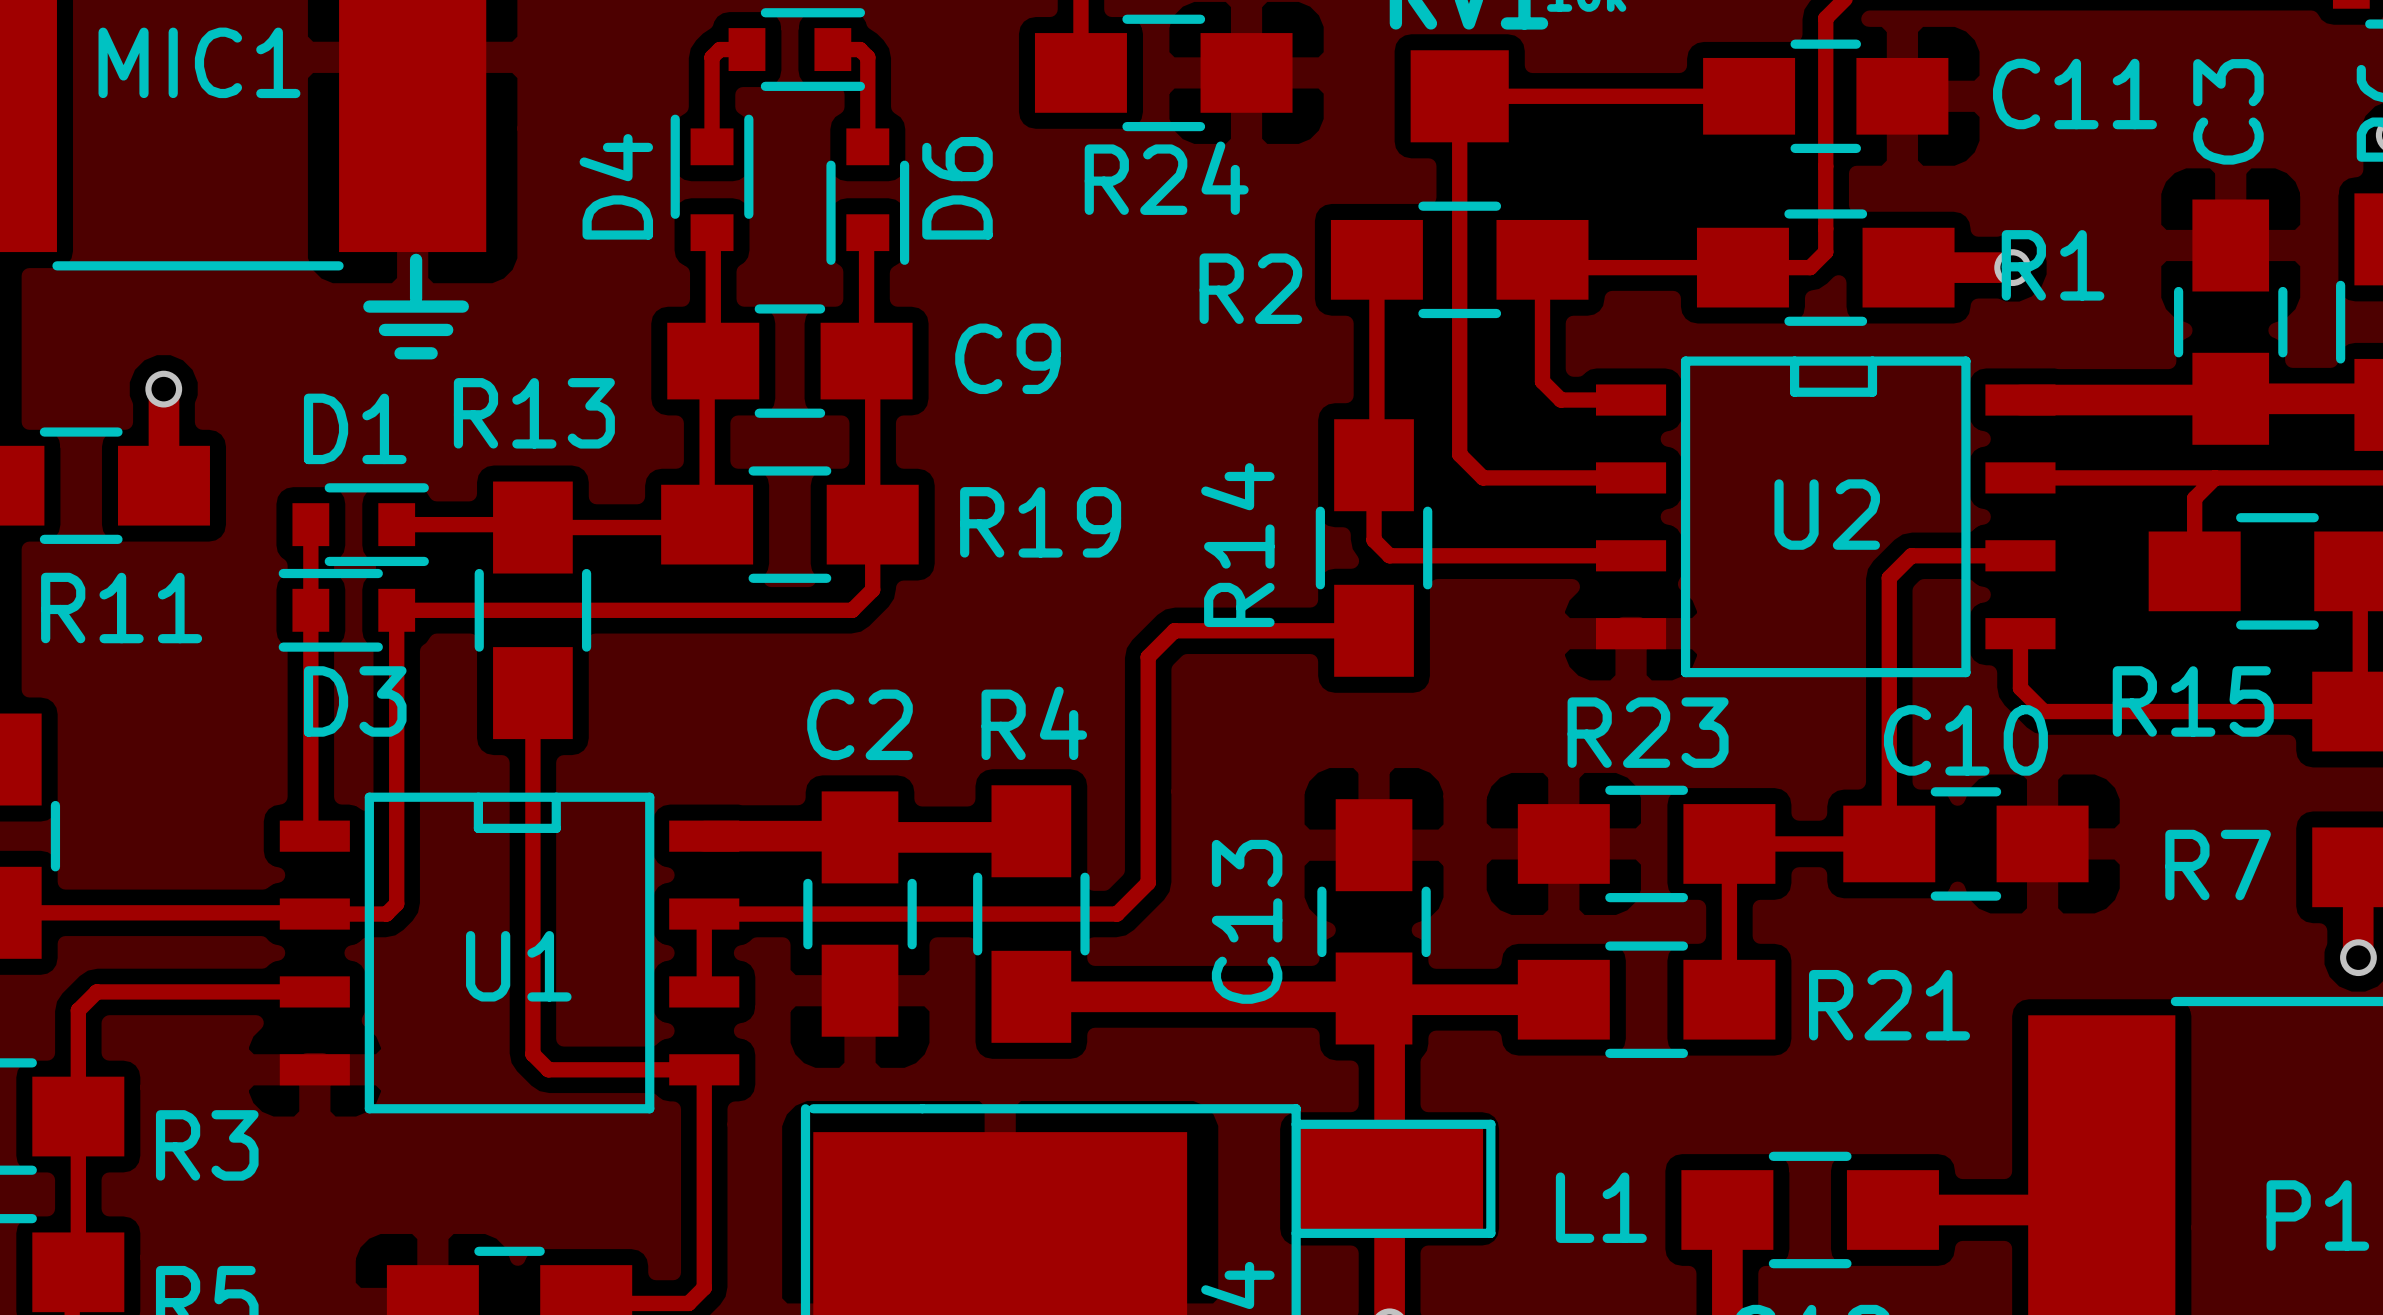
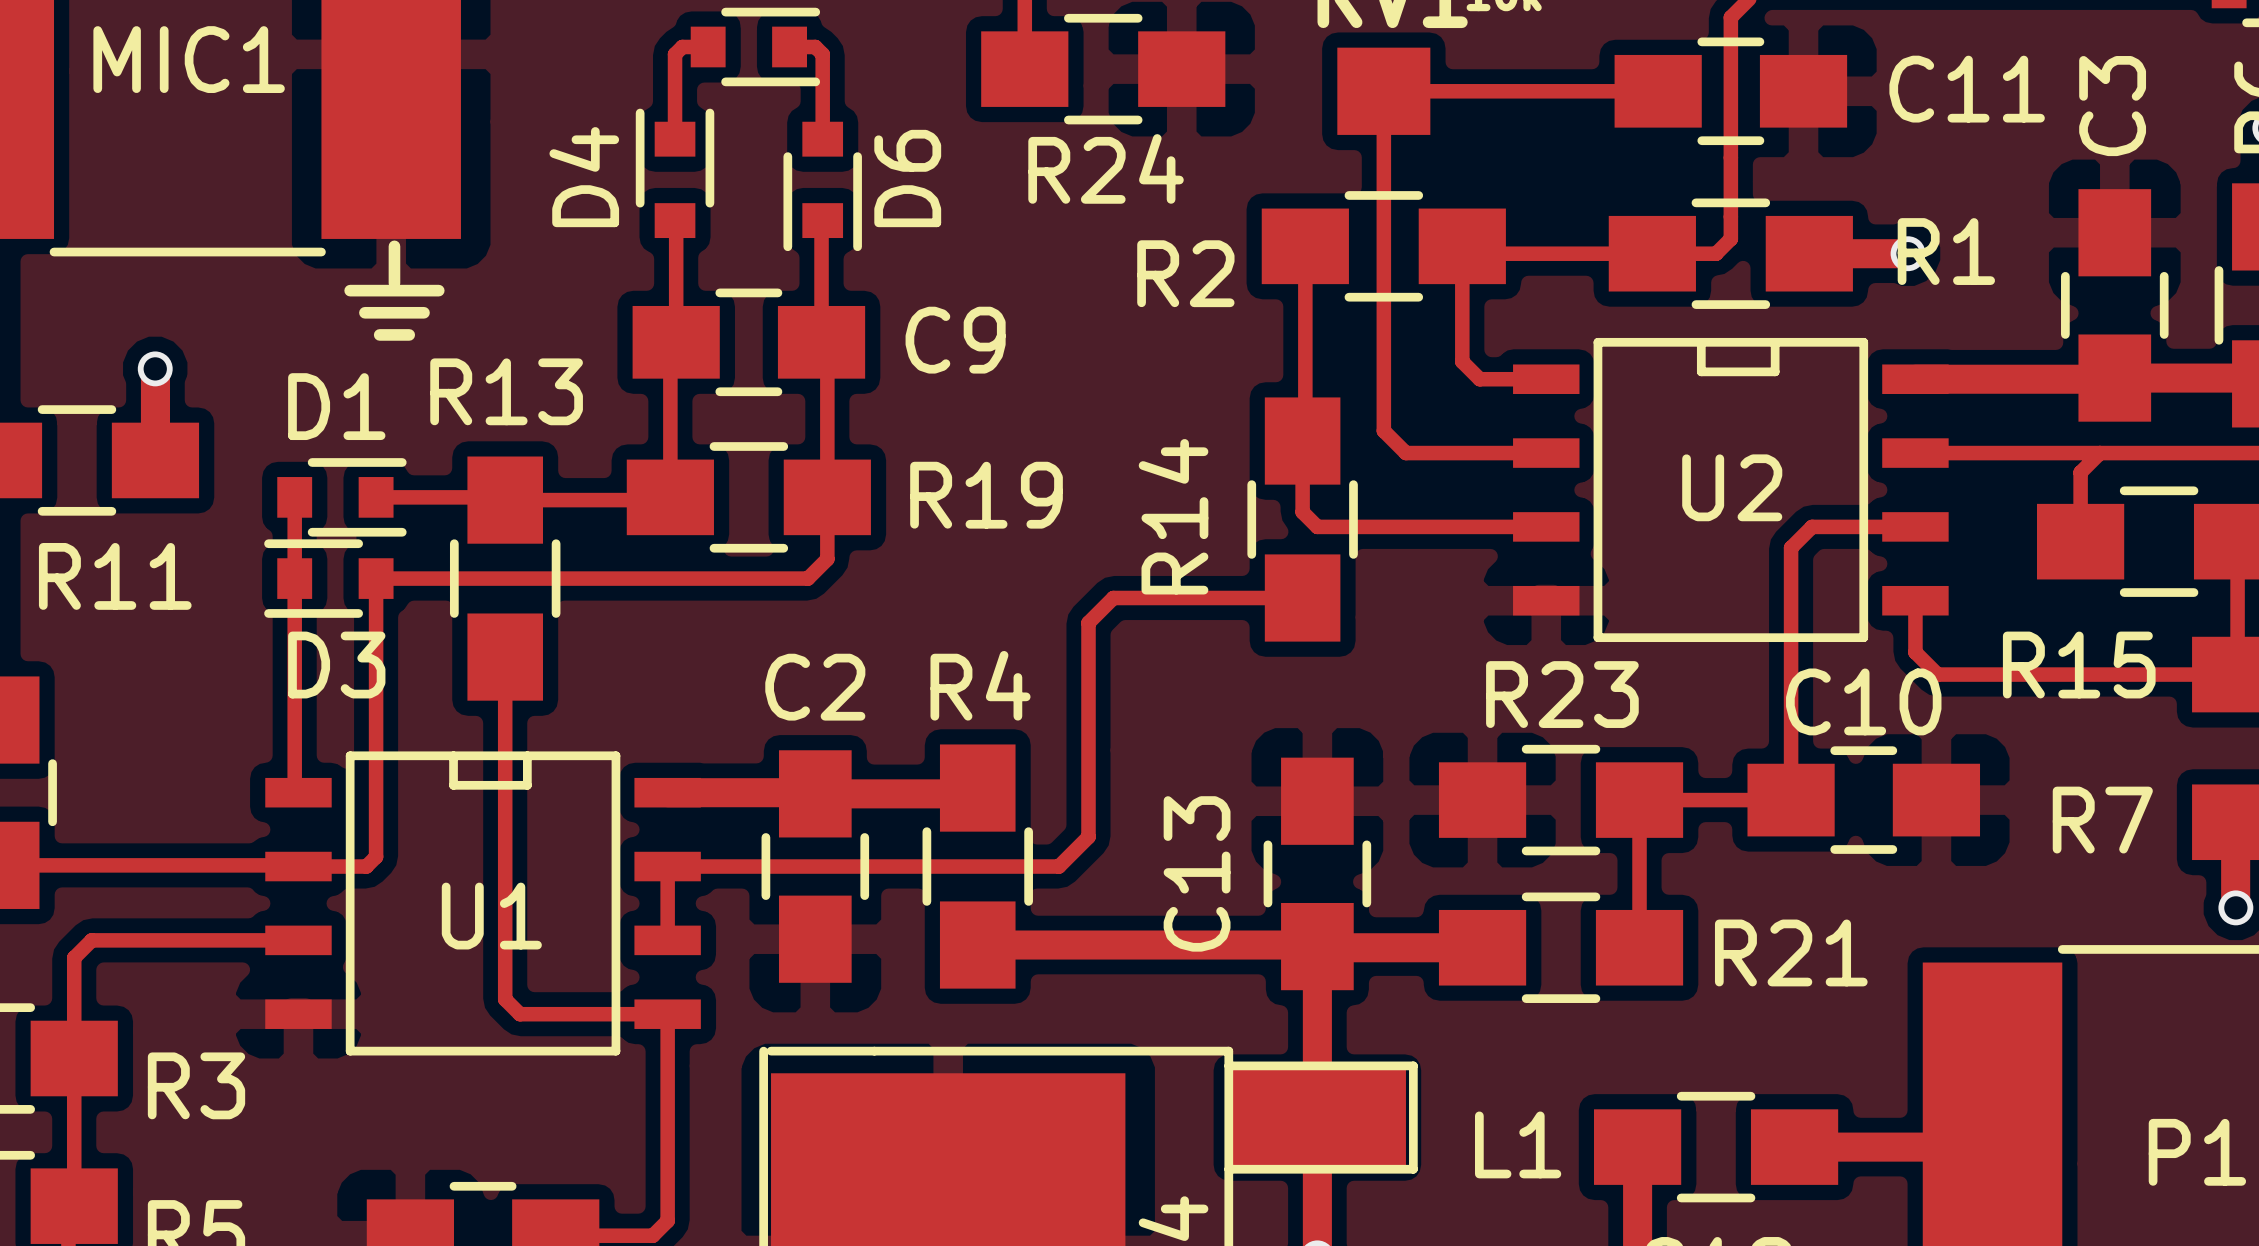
C13 position: (1374, 921) -> (1317, 873)

